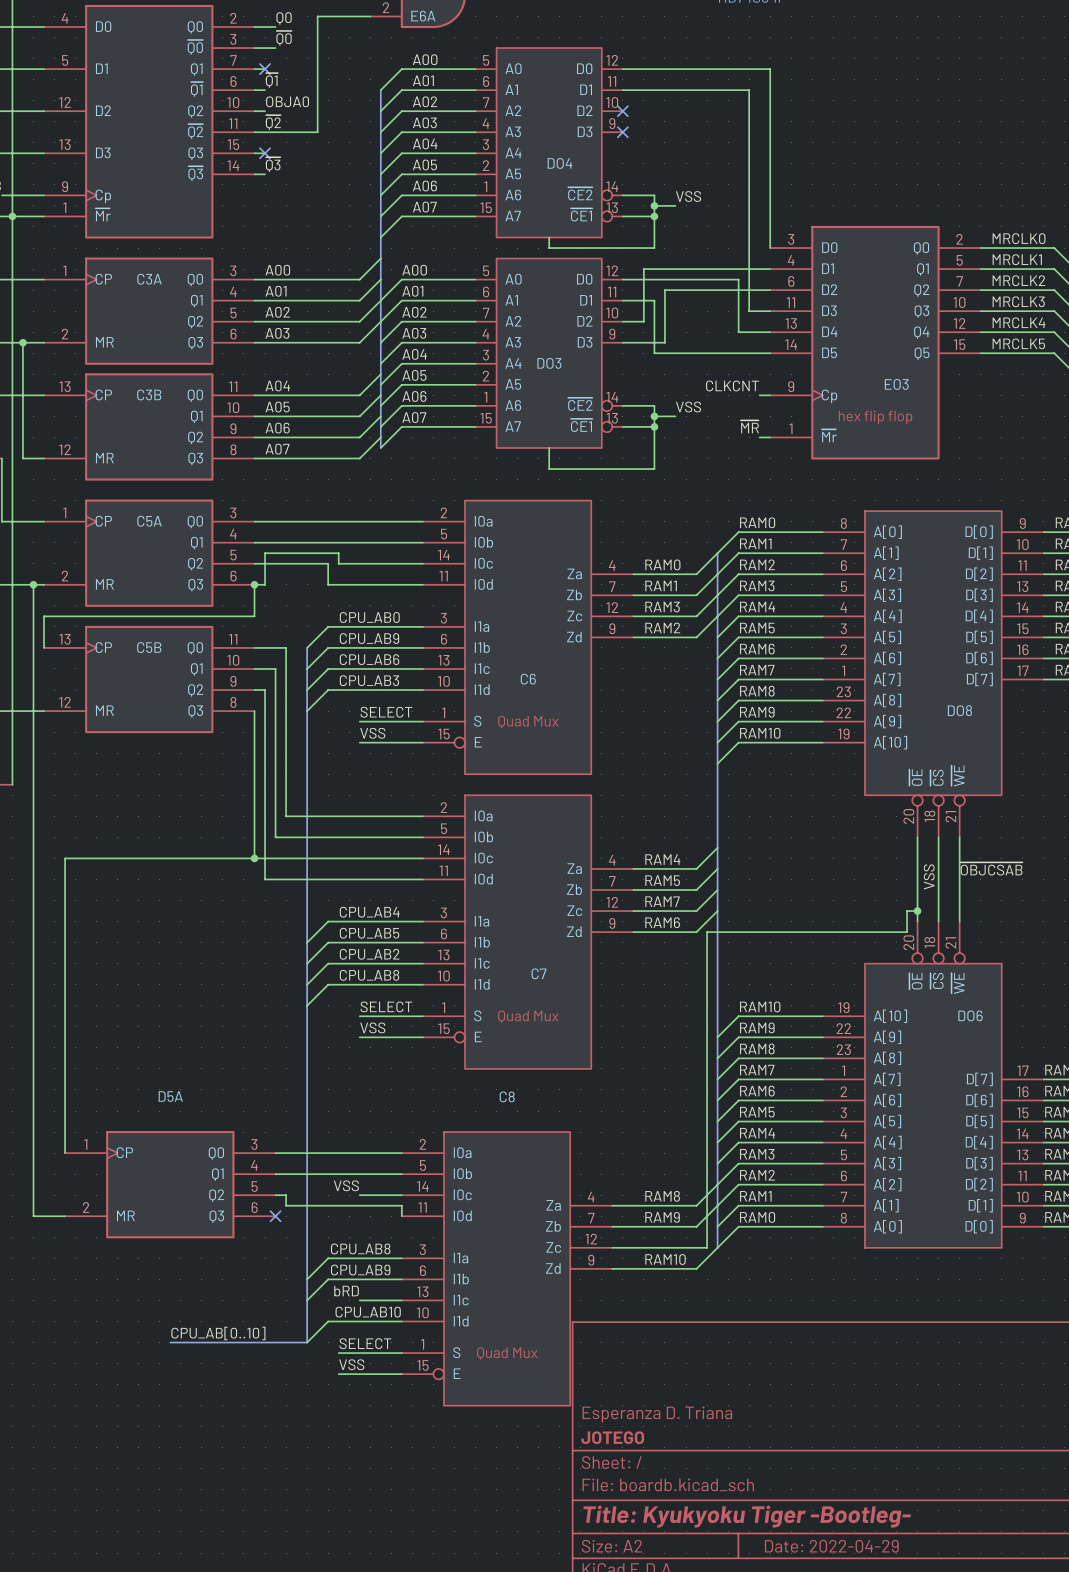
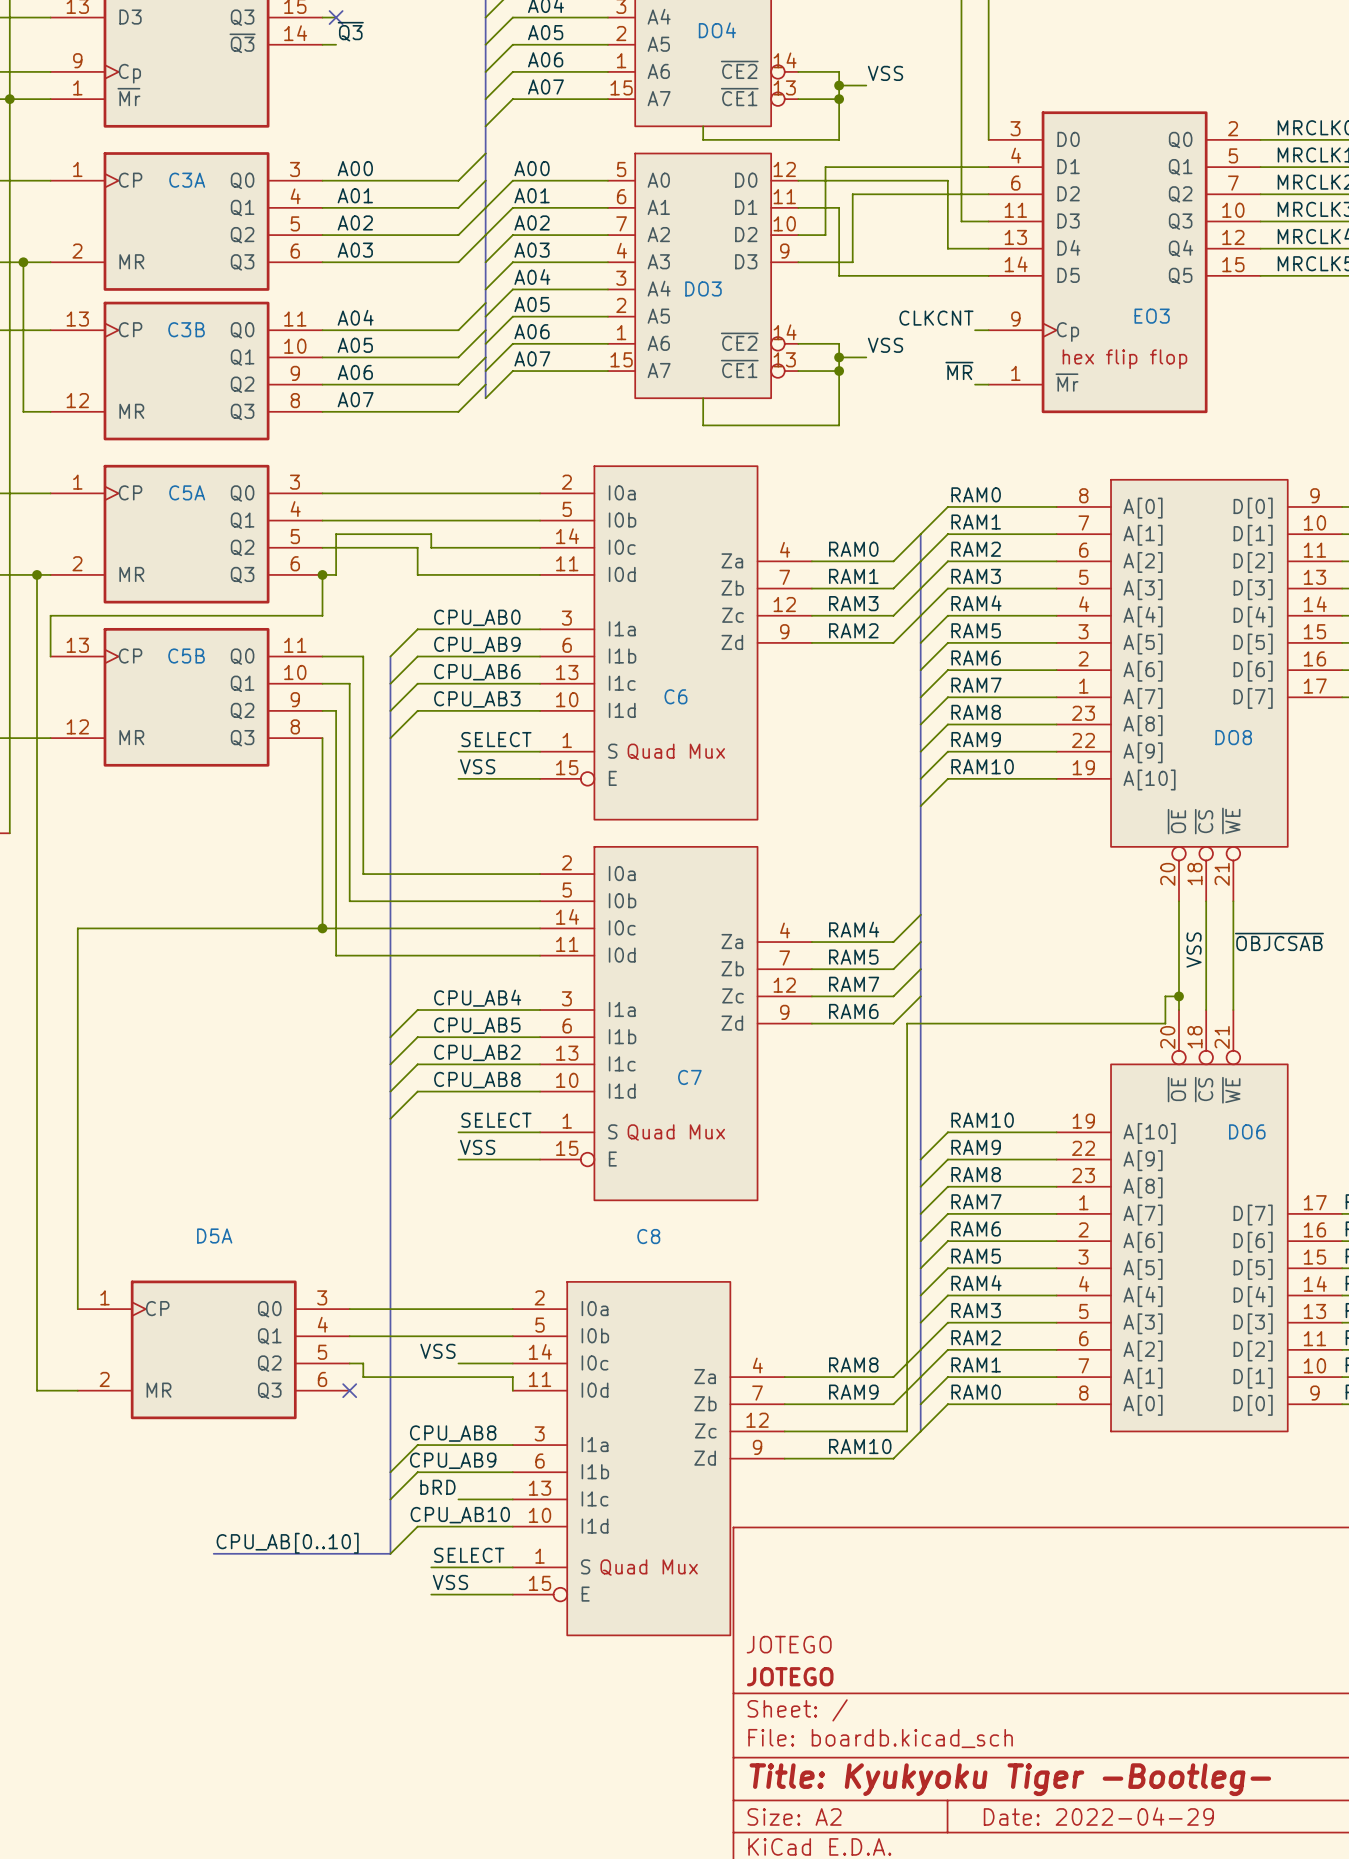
title block: Esperanza D. Triana (657, 1414) -> JOTEGO (789, 1644)

